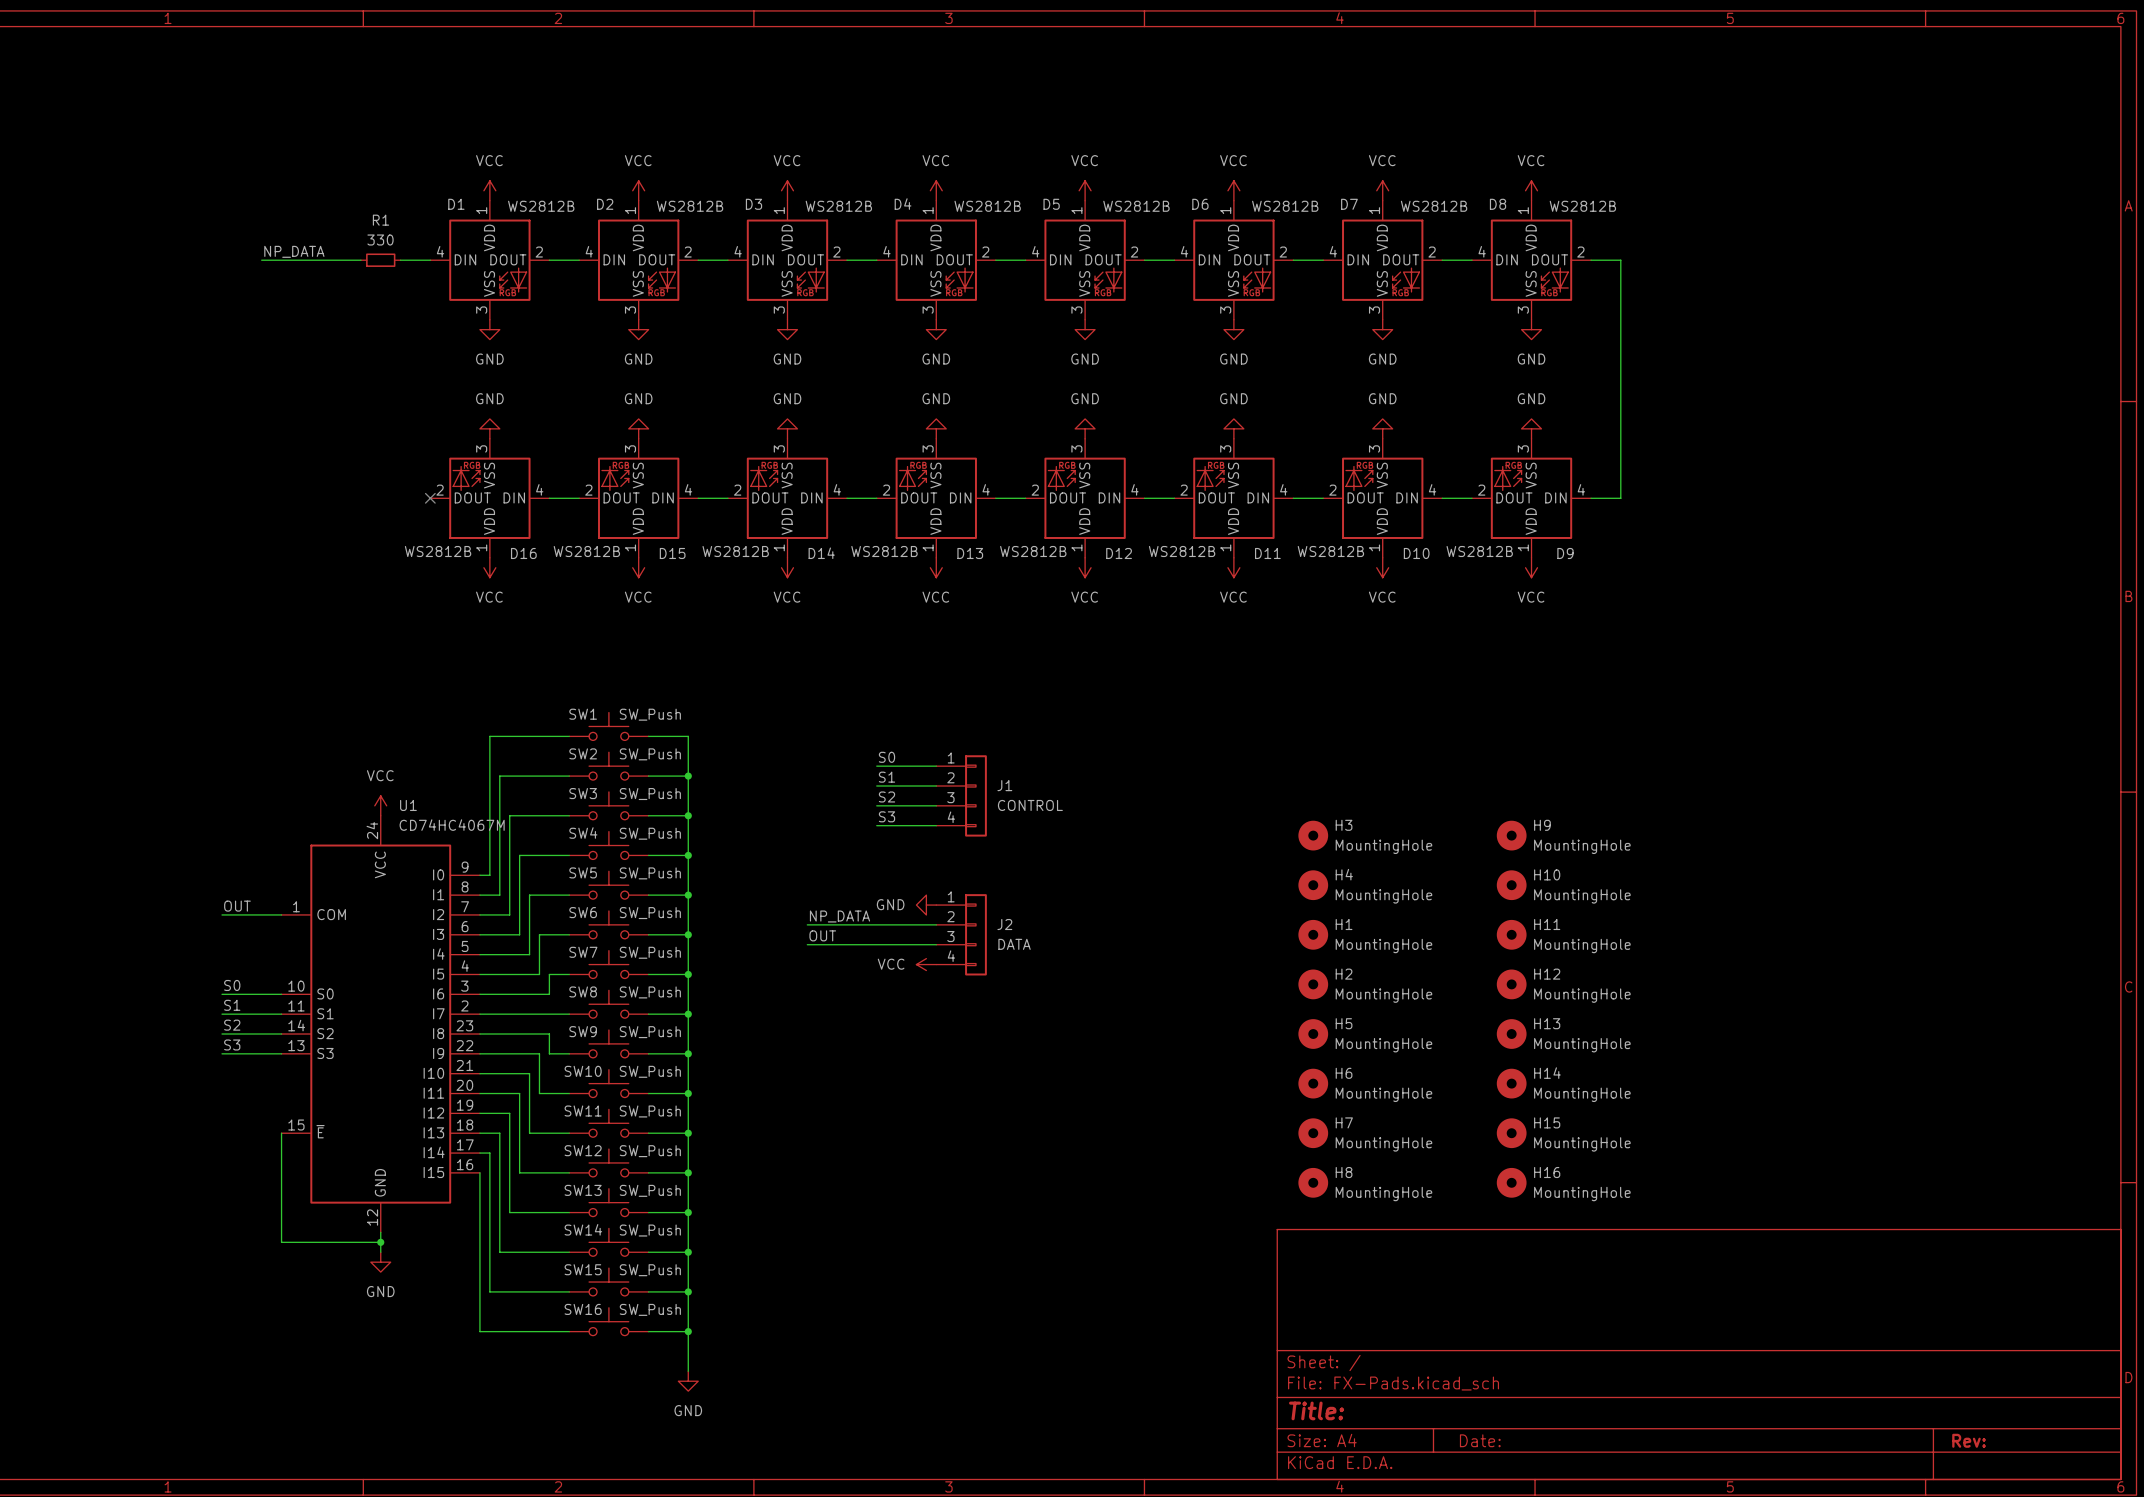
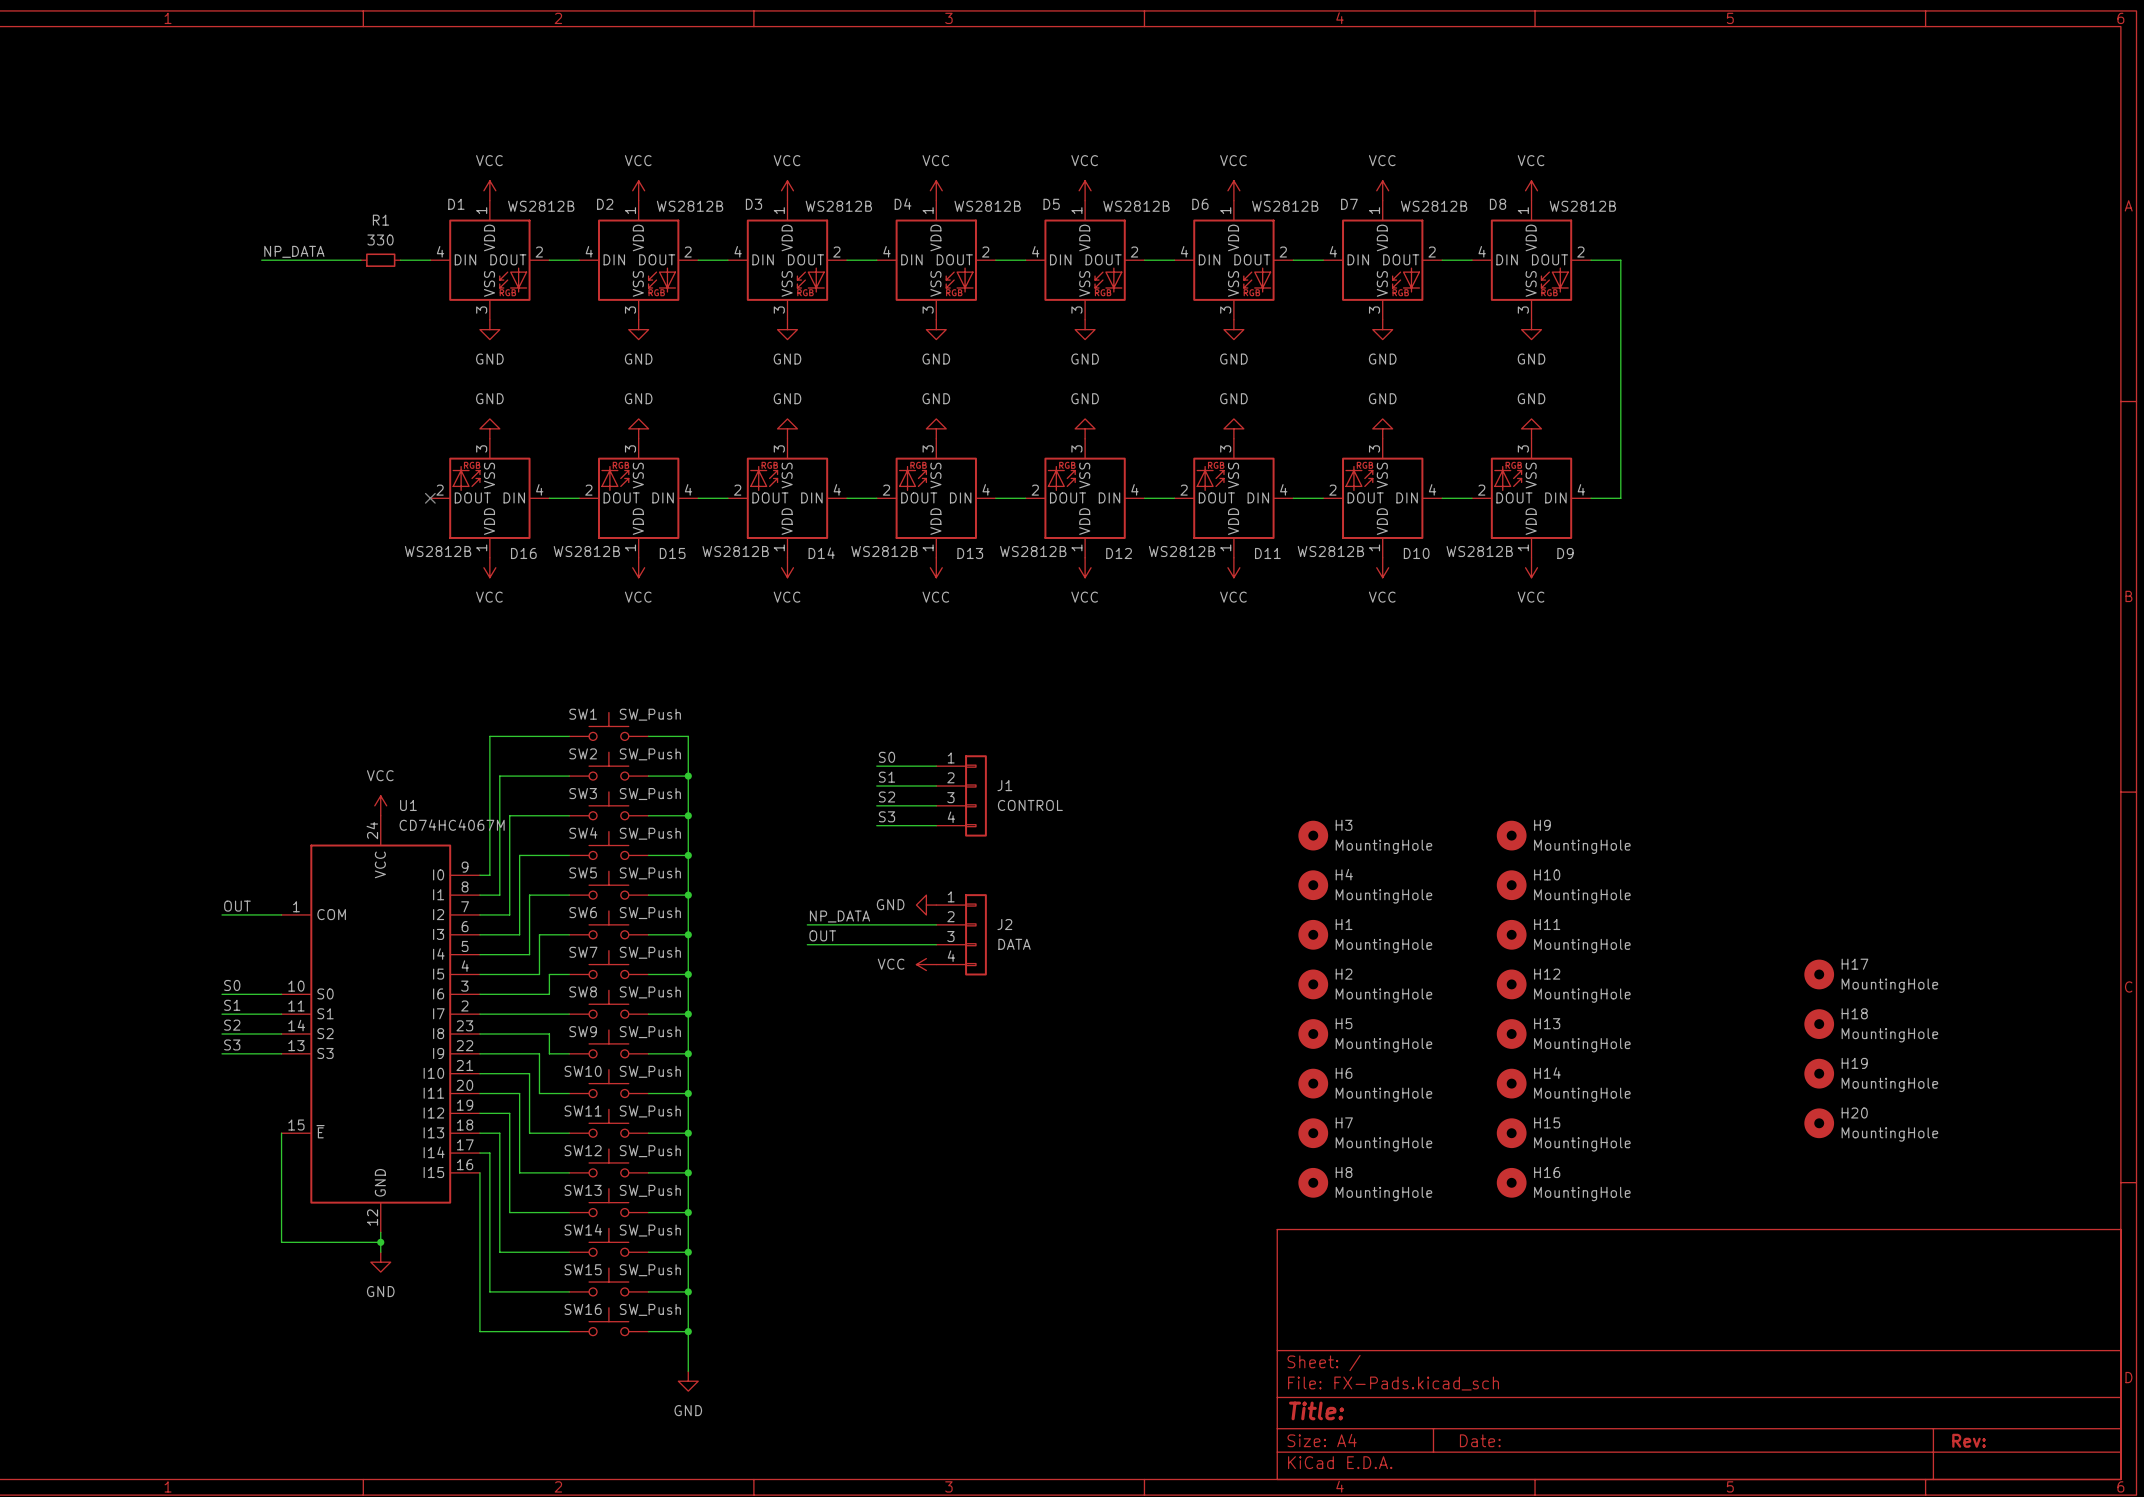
H17: none -> MountingHole (1819, 974)
H18: none -> MountingHole (1819, 1024)
H19: none -> MountingHole (1819, 1073)
H20: none -> MountingHole (1819, 1123)

